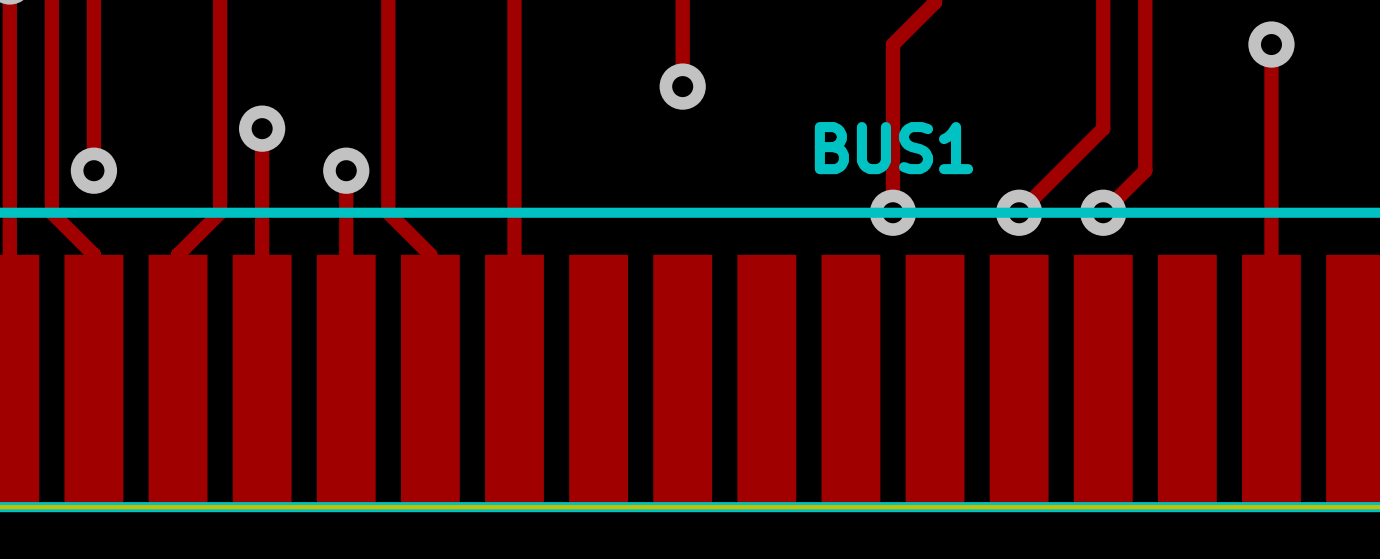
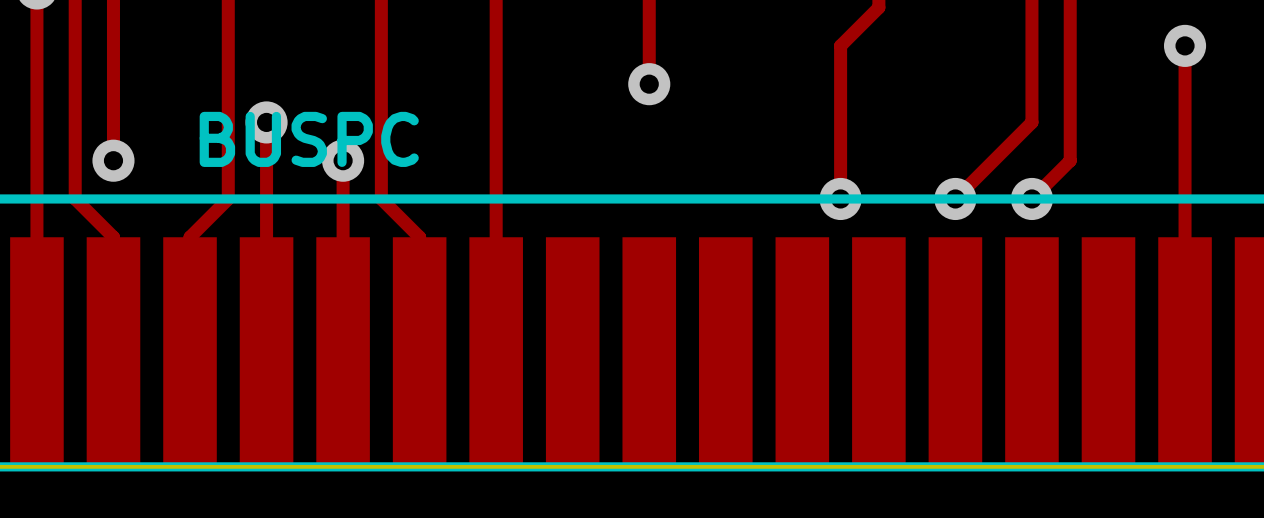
BUS1 value: none -> BUSPC (309, 139)
BUS1 name: BUS1 (893, 148) -> none

